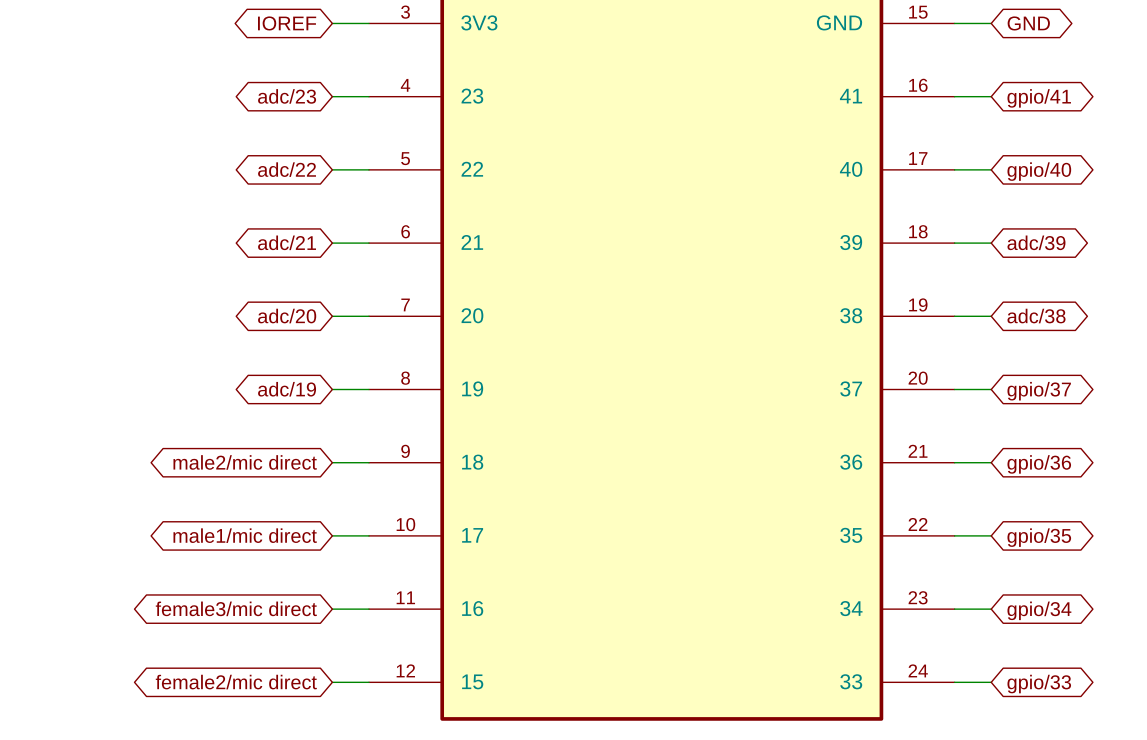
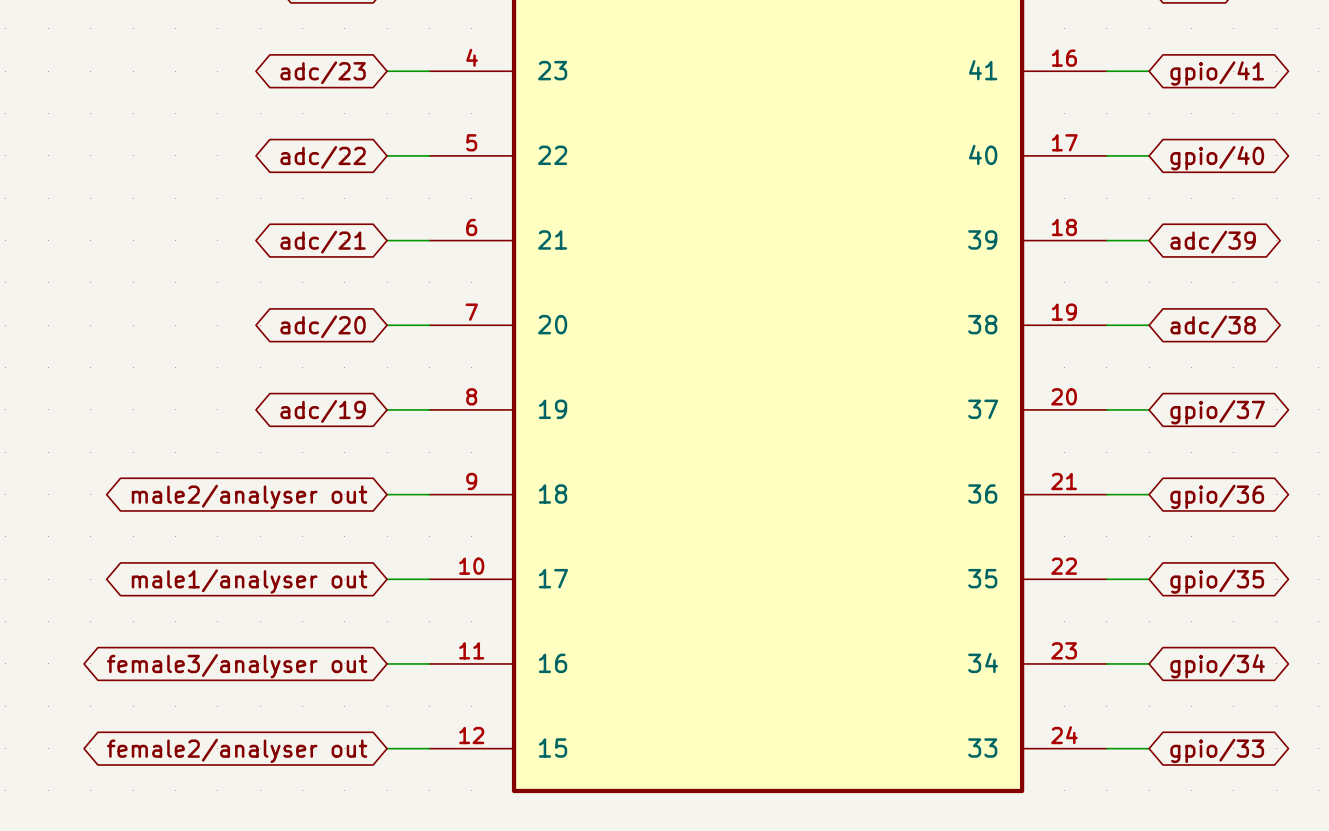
global label: male2/mic direct (245, 462) -> male2/analyser out (249, 496)
global label: male1/mic direct (245, 535) -> male1/analyser out (249, 581)
global label: female3/mic direct (236, 608) -> female3/analyser out (237, 666)
global label: female2/mic direct (236, 682) -> female2/analyser out (237, 750)

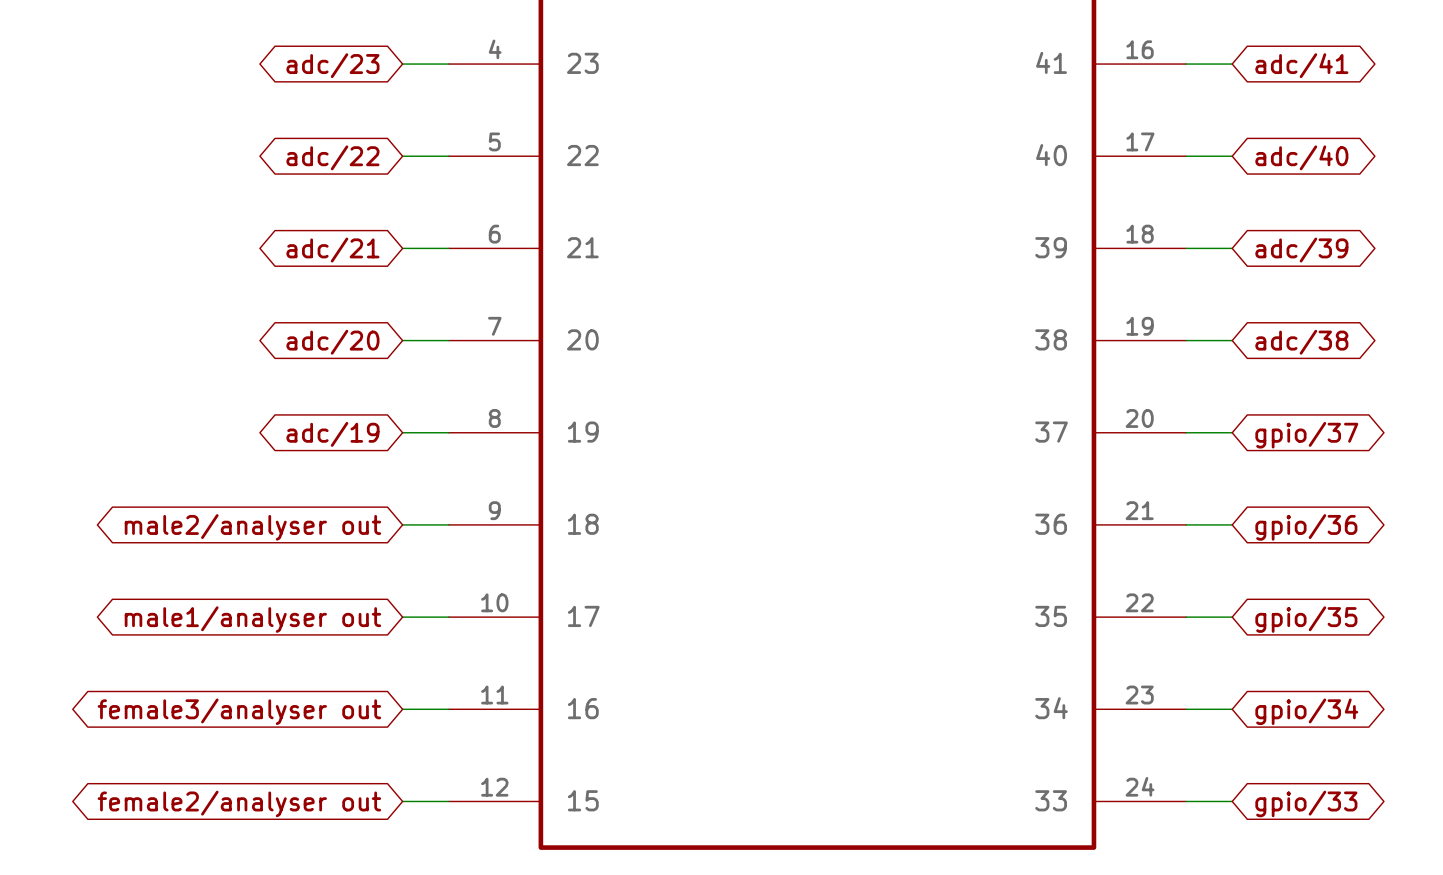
global label: gpio/41 (1217, 73) -> adc/41 (1301, 65)
global label: gpio/40 (1217, 158) -> adc/40 (1301, 157)

